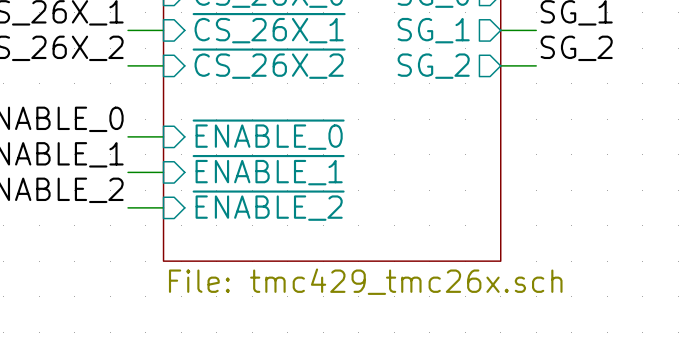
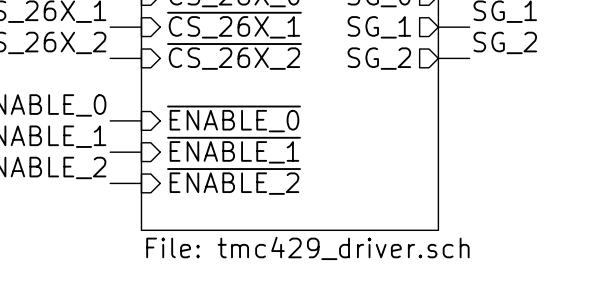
sheet value: File: tmc429_tmc26x.sch (365, 281) -> File: tmc429_driver.sch (307, 248)

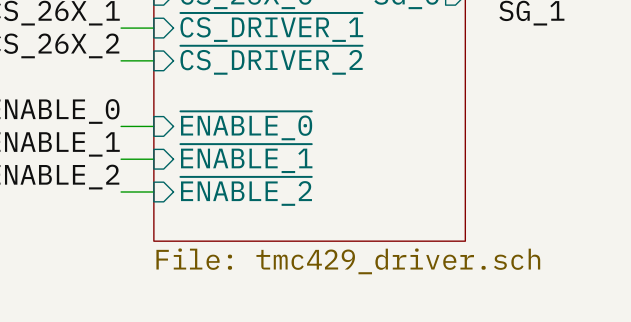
sheet pin: ~{CS_26X_1} (234, 25) -> ~{CS_DRIVER_1} (271, 27)
sheet pin: SG_1 (379, 27) -> none
wire: (438, 27) (469, 27) -> none
label: SG_2 (505, 42) -> none
sheet pin: ~{CS_26X_2} (234, 56) -> ~{CS_DRIVER_2} (271, 60)
sheet pin: SG_2 (379, 58) -> none
wire: (438, 58) (469, 58) -> none

